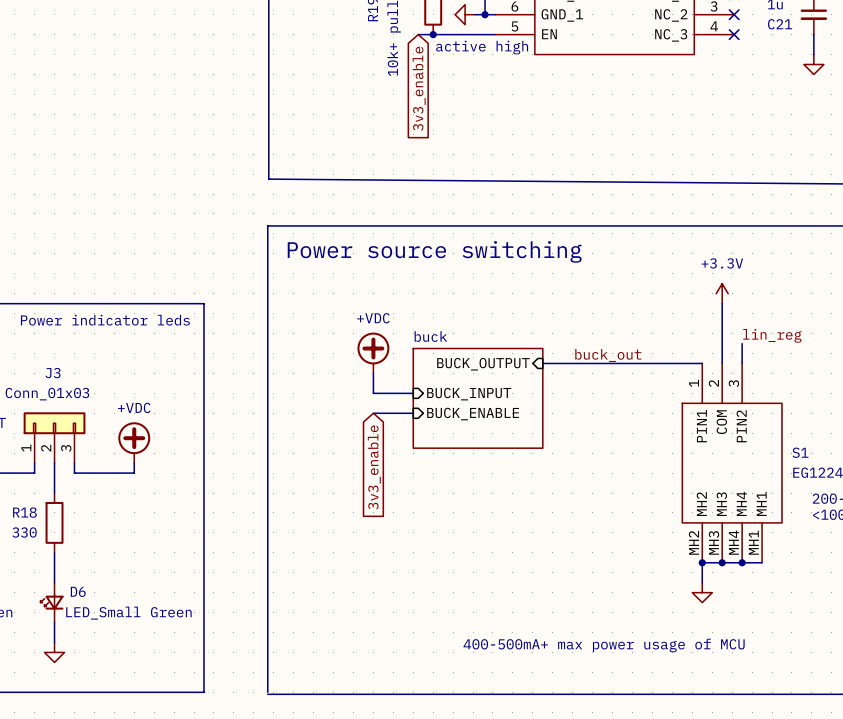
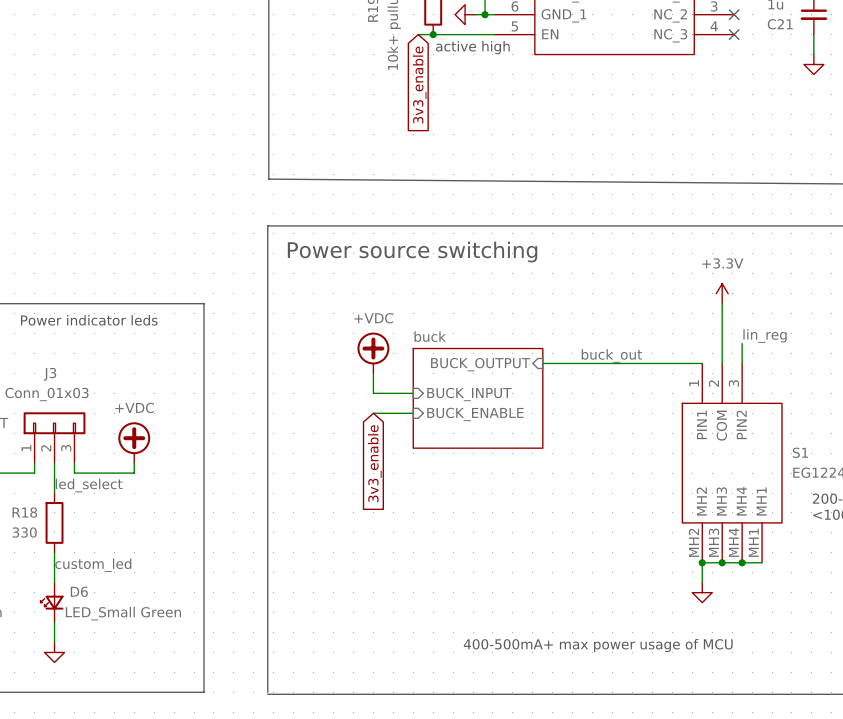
label: none -> led_select (89, 485)
label: none -> custom_led (93, 565)

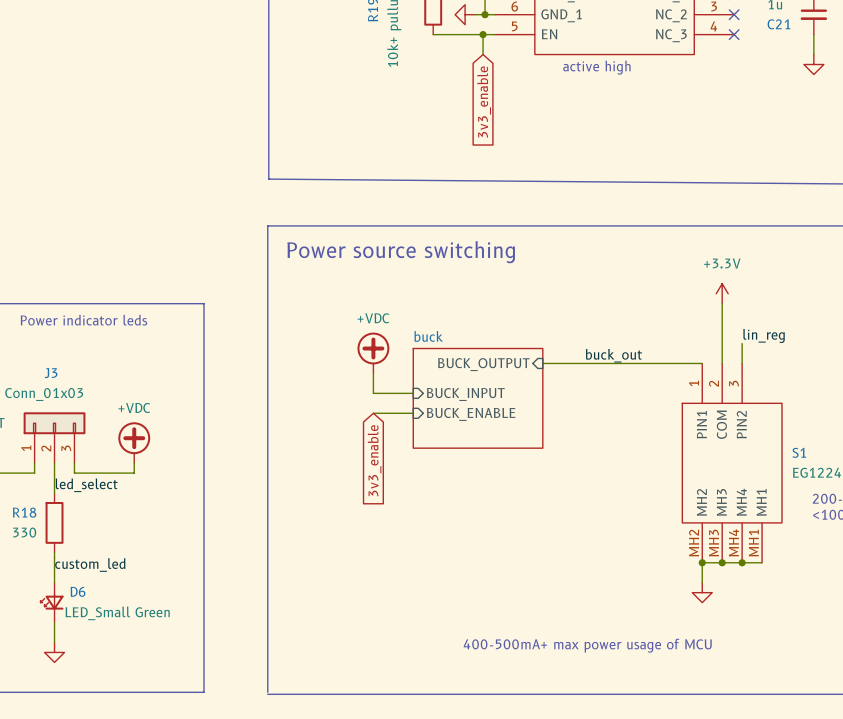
wire: (418, 34) (433, 34) -> none
junction: (433, 34) -> none
wire: none -> (483, 34) (483, 54)
junction: none -> (483, 34)
text position: active high (472, 47) -> active high (596, 67)
global label position: 3v3_enable (419, 84) -> 3v3_enable (484, 102)

